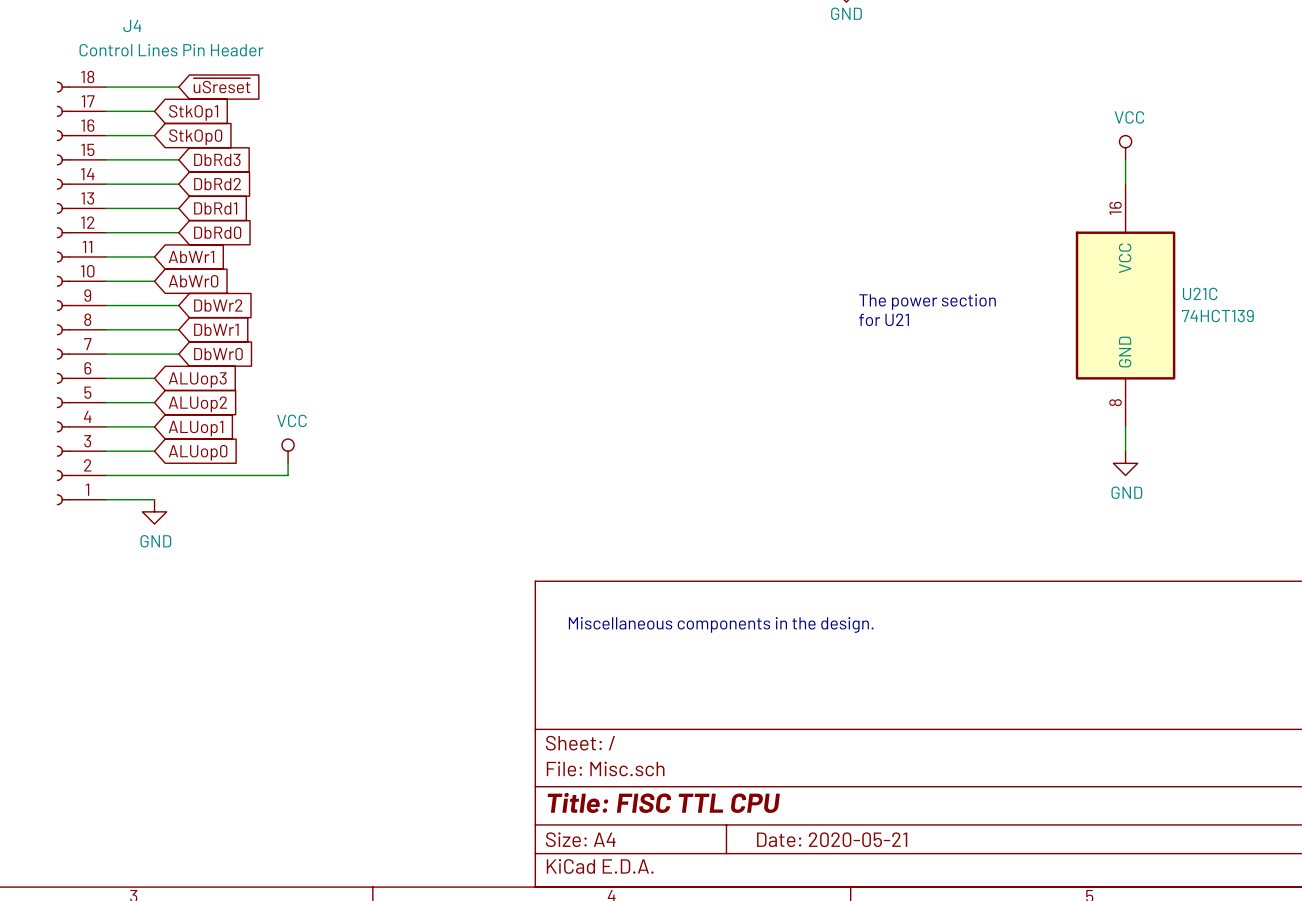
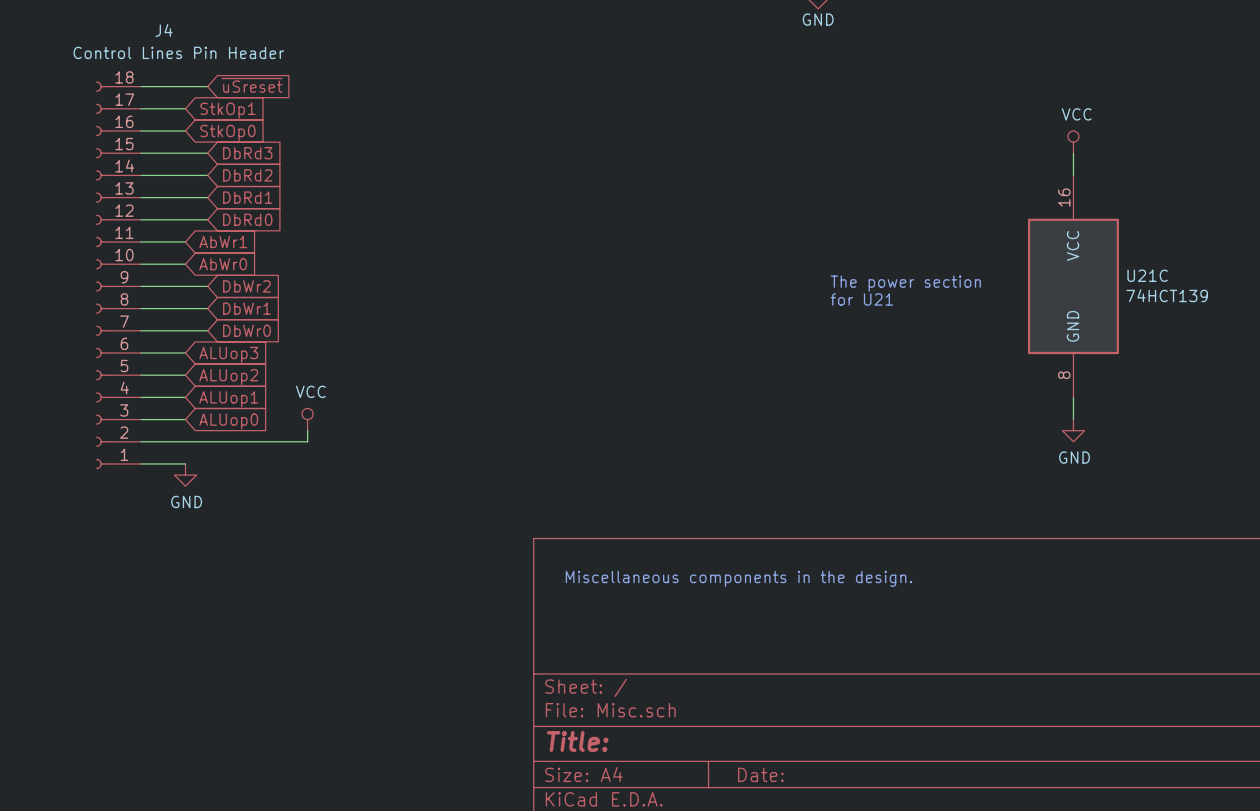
title block: Title: FISC TTL CPU (663, 802) -> Title: (577, 741)
title block: Date: 2020-05-21 (832, 839) -> Date: (760, 774)

